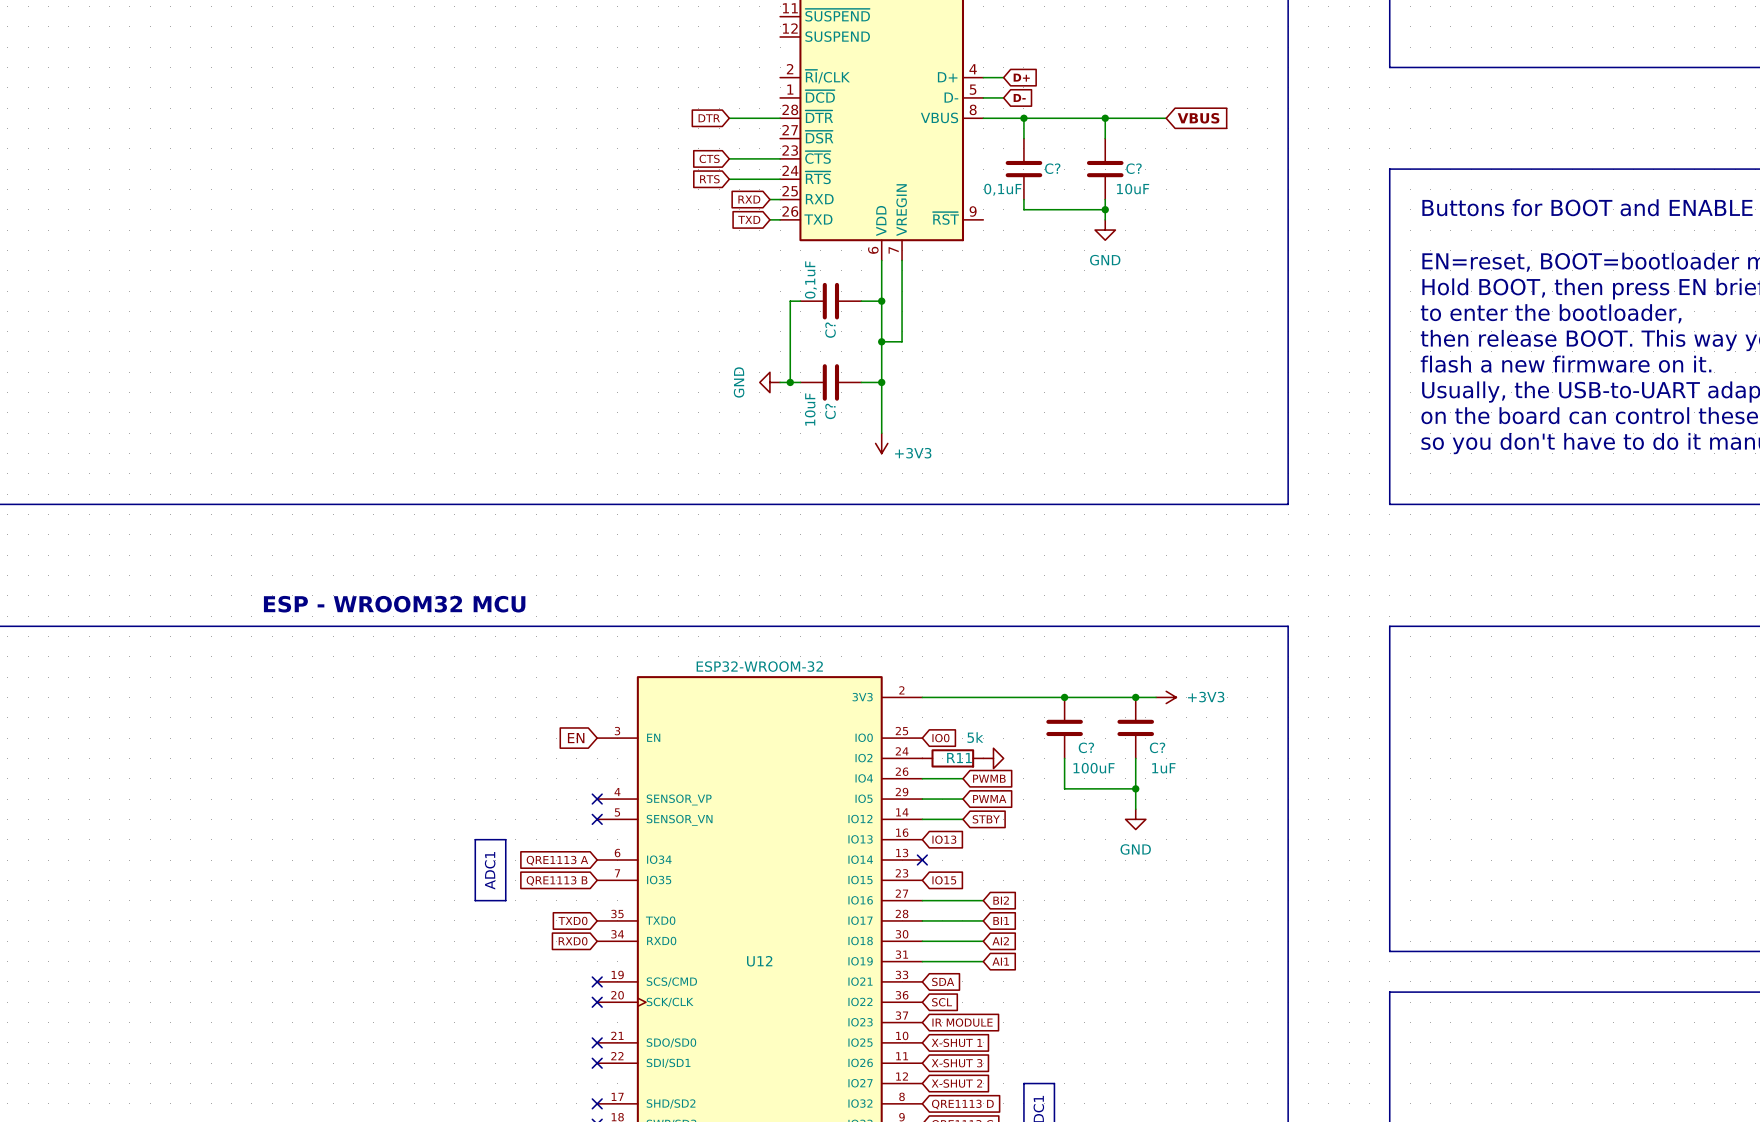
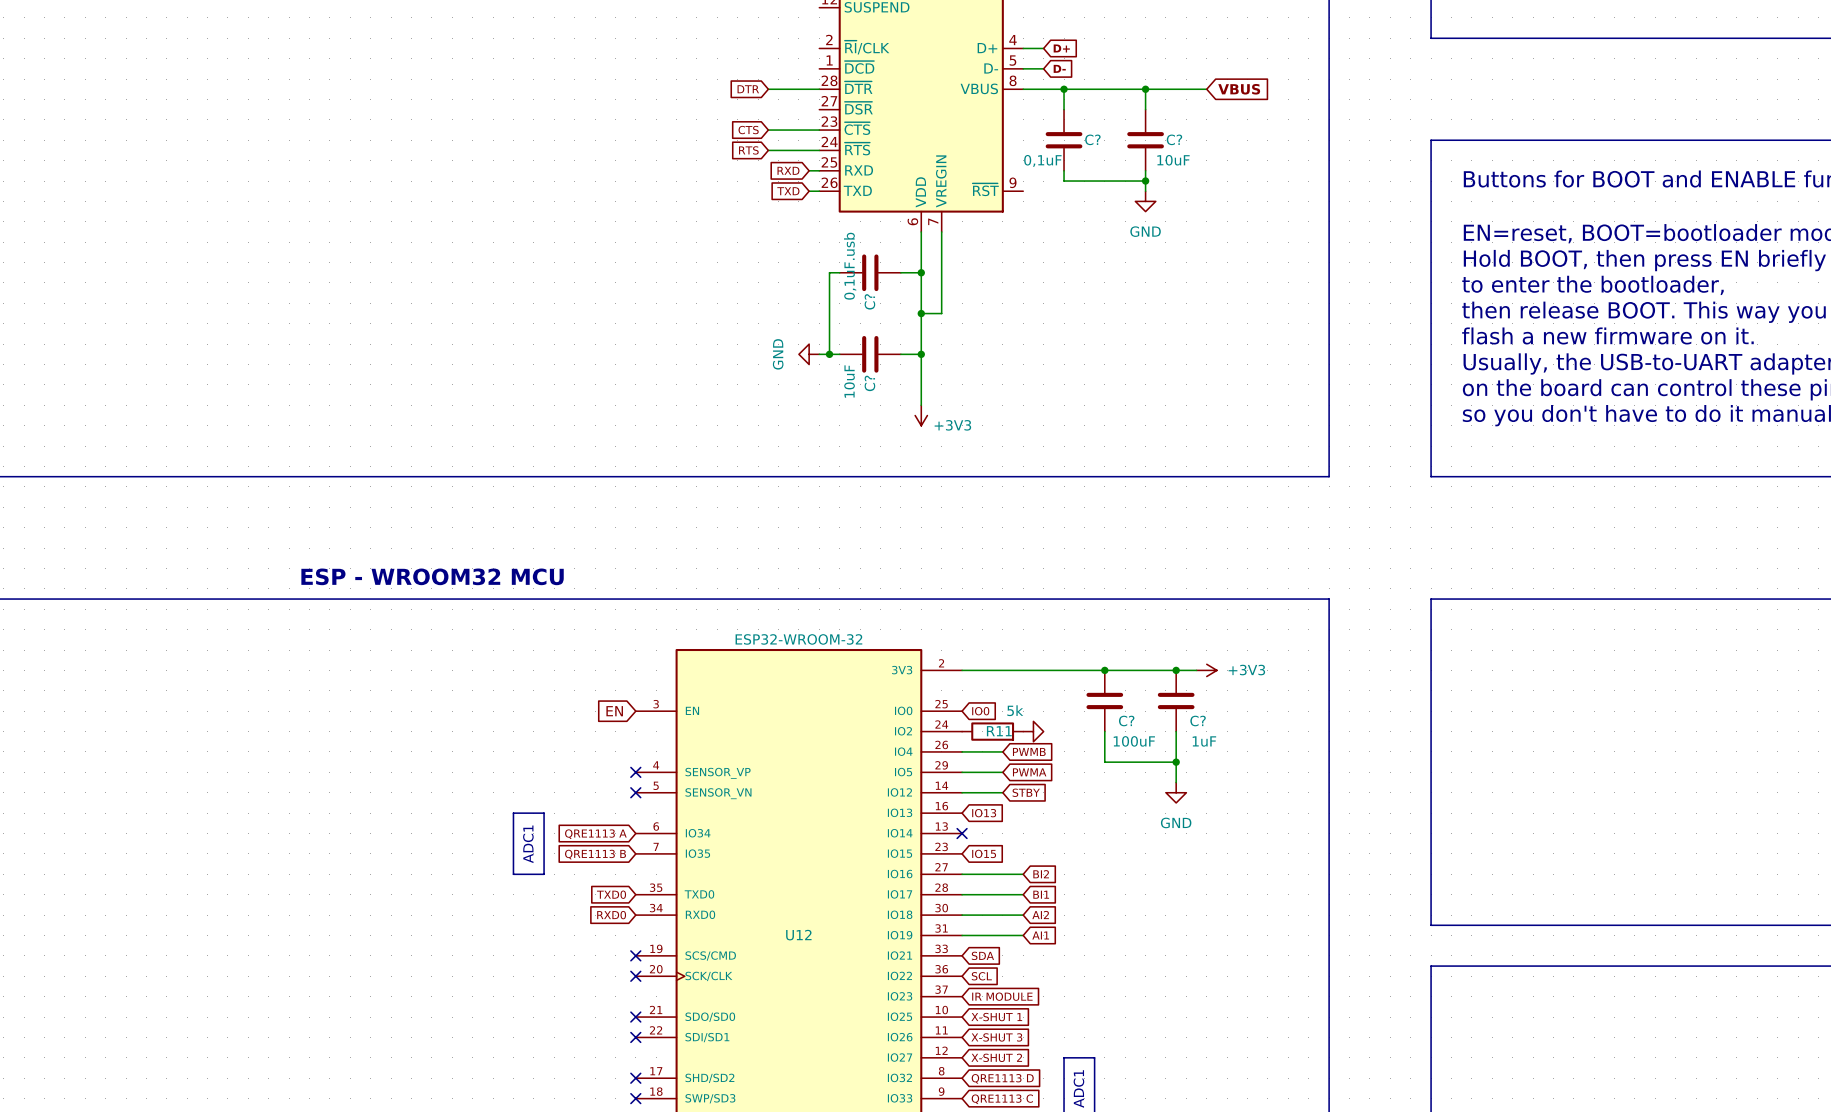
C? value: 0,1uF (810, 279) -> 0,1uF.usb (850, 266)

